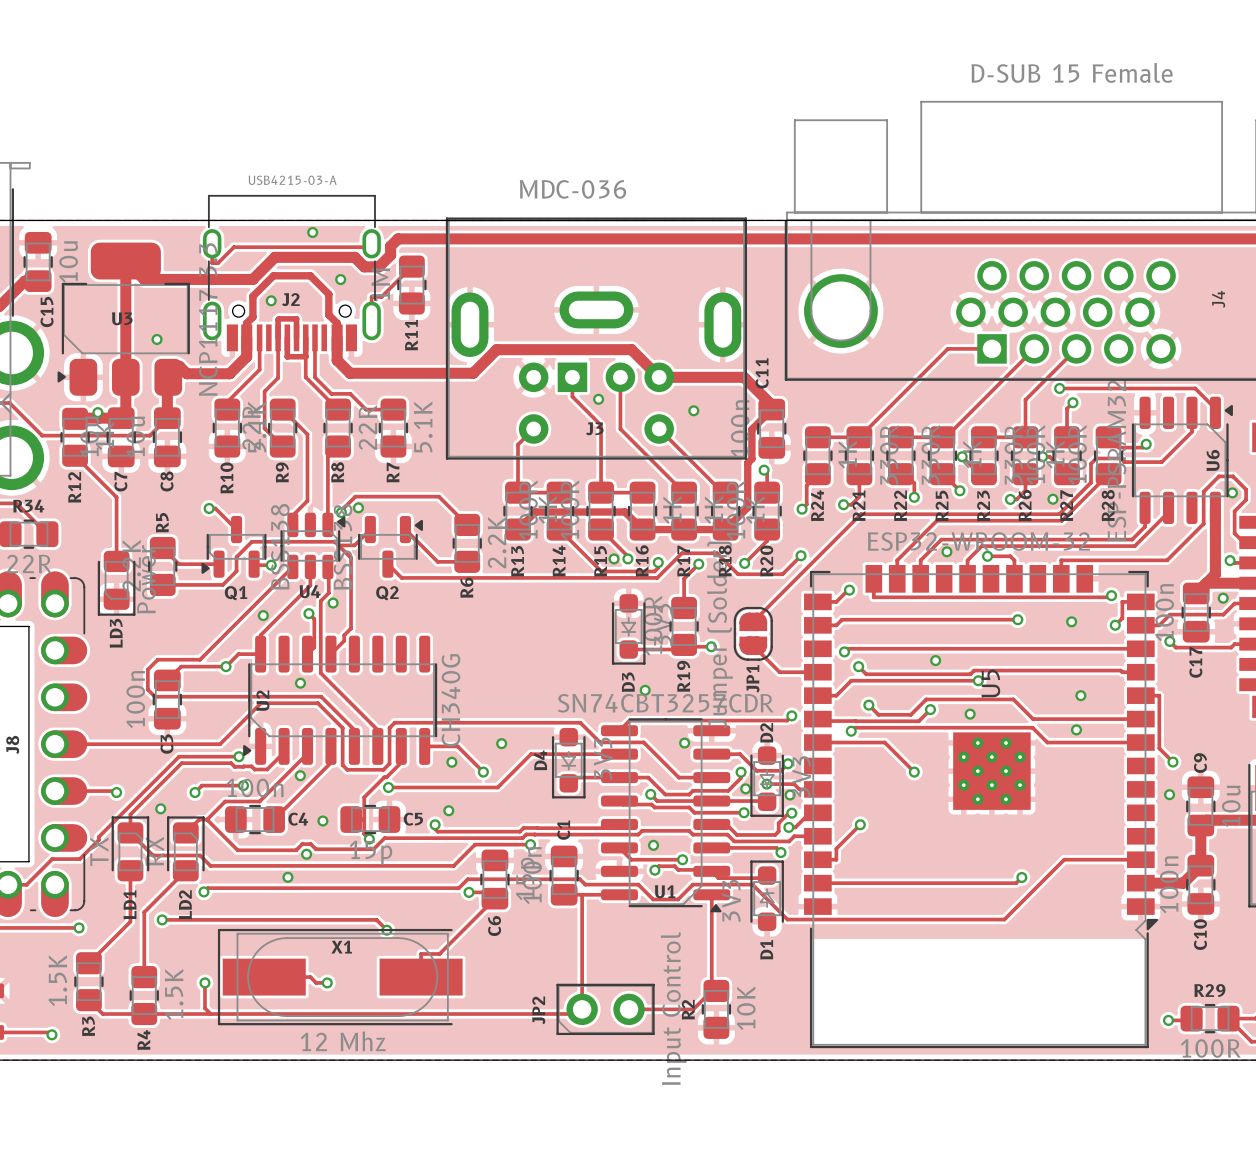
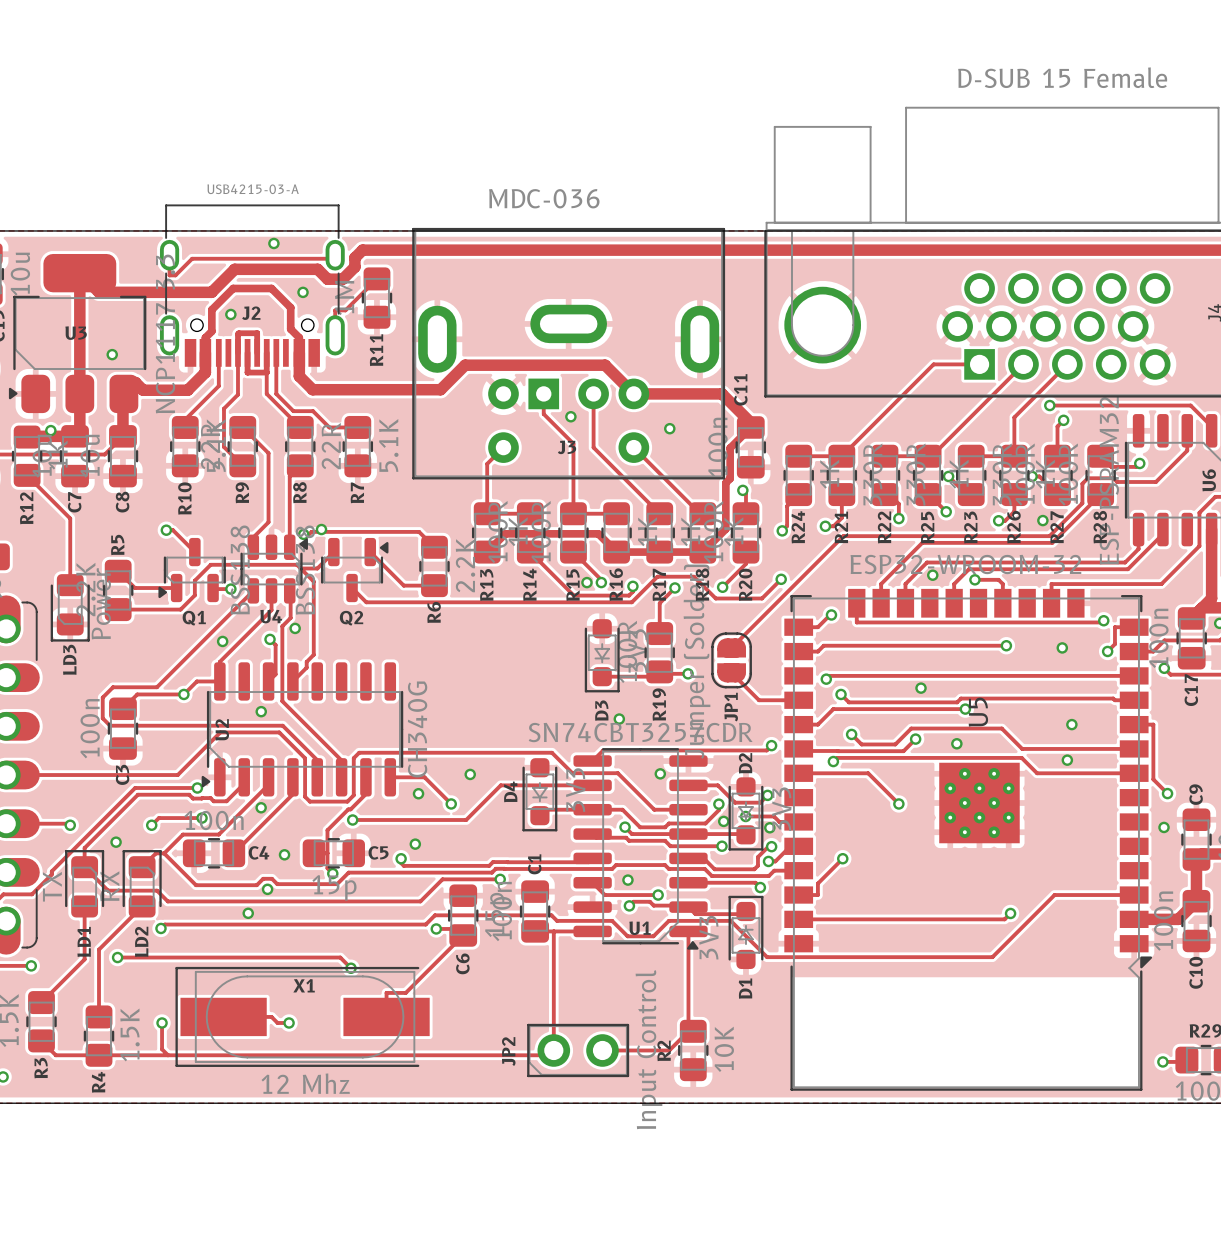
track: (452, 510) (438, 496) (355, 496) (341, 512) -> (419, 531) (311, 531) (306, 536)

